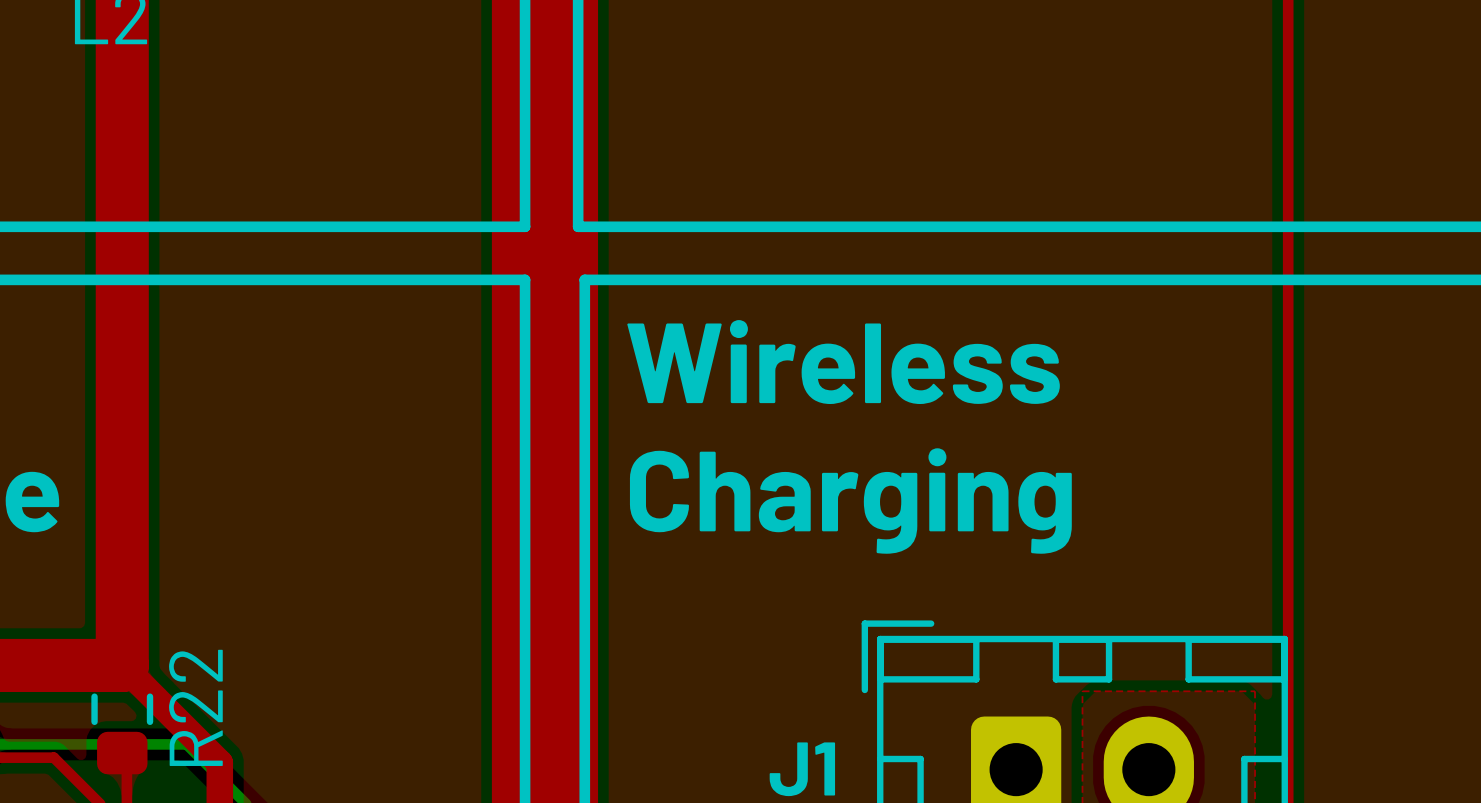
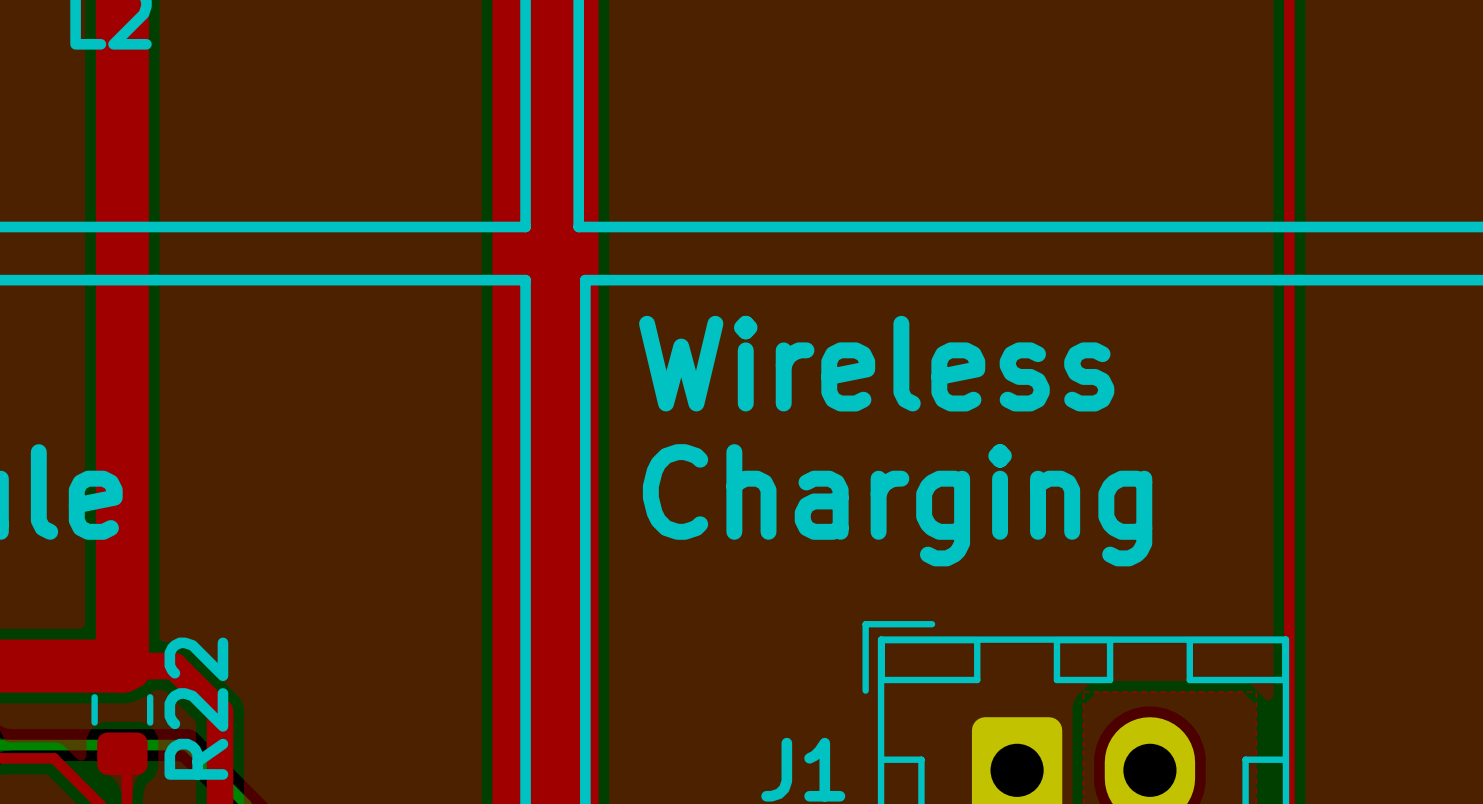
top track: (122, 665) (219, 762) -> (122, 666) (174, 666) (220, 711) (220, 763)

